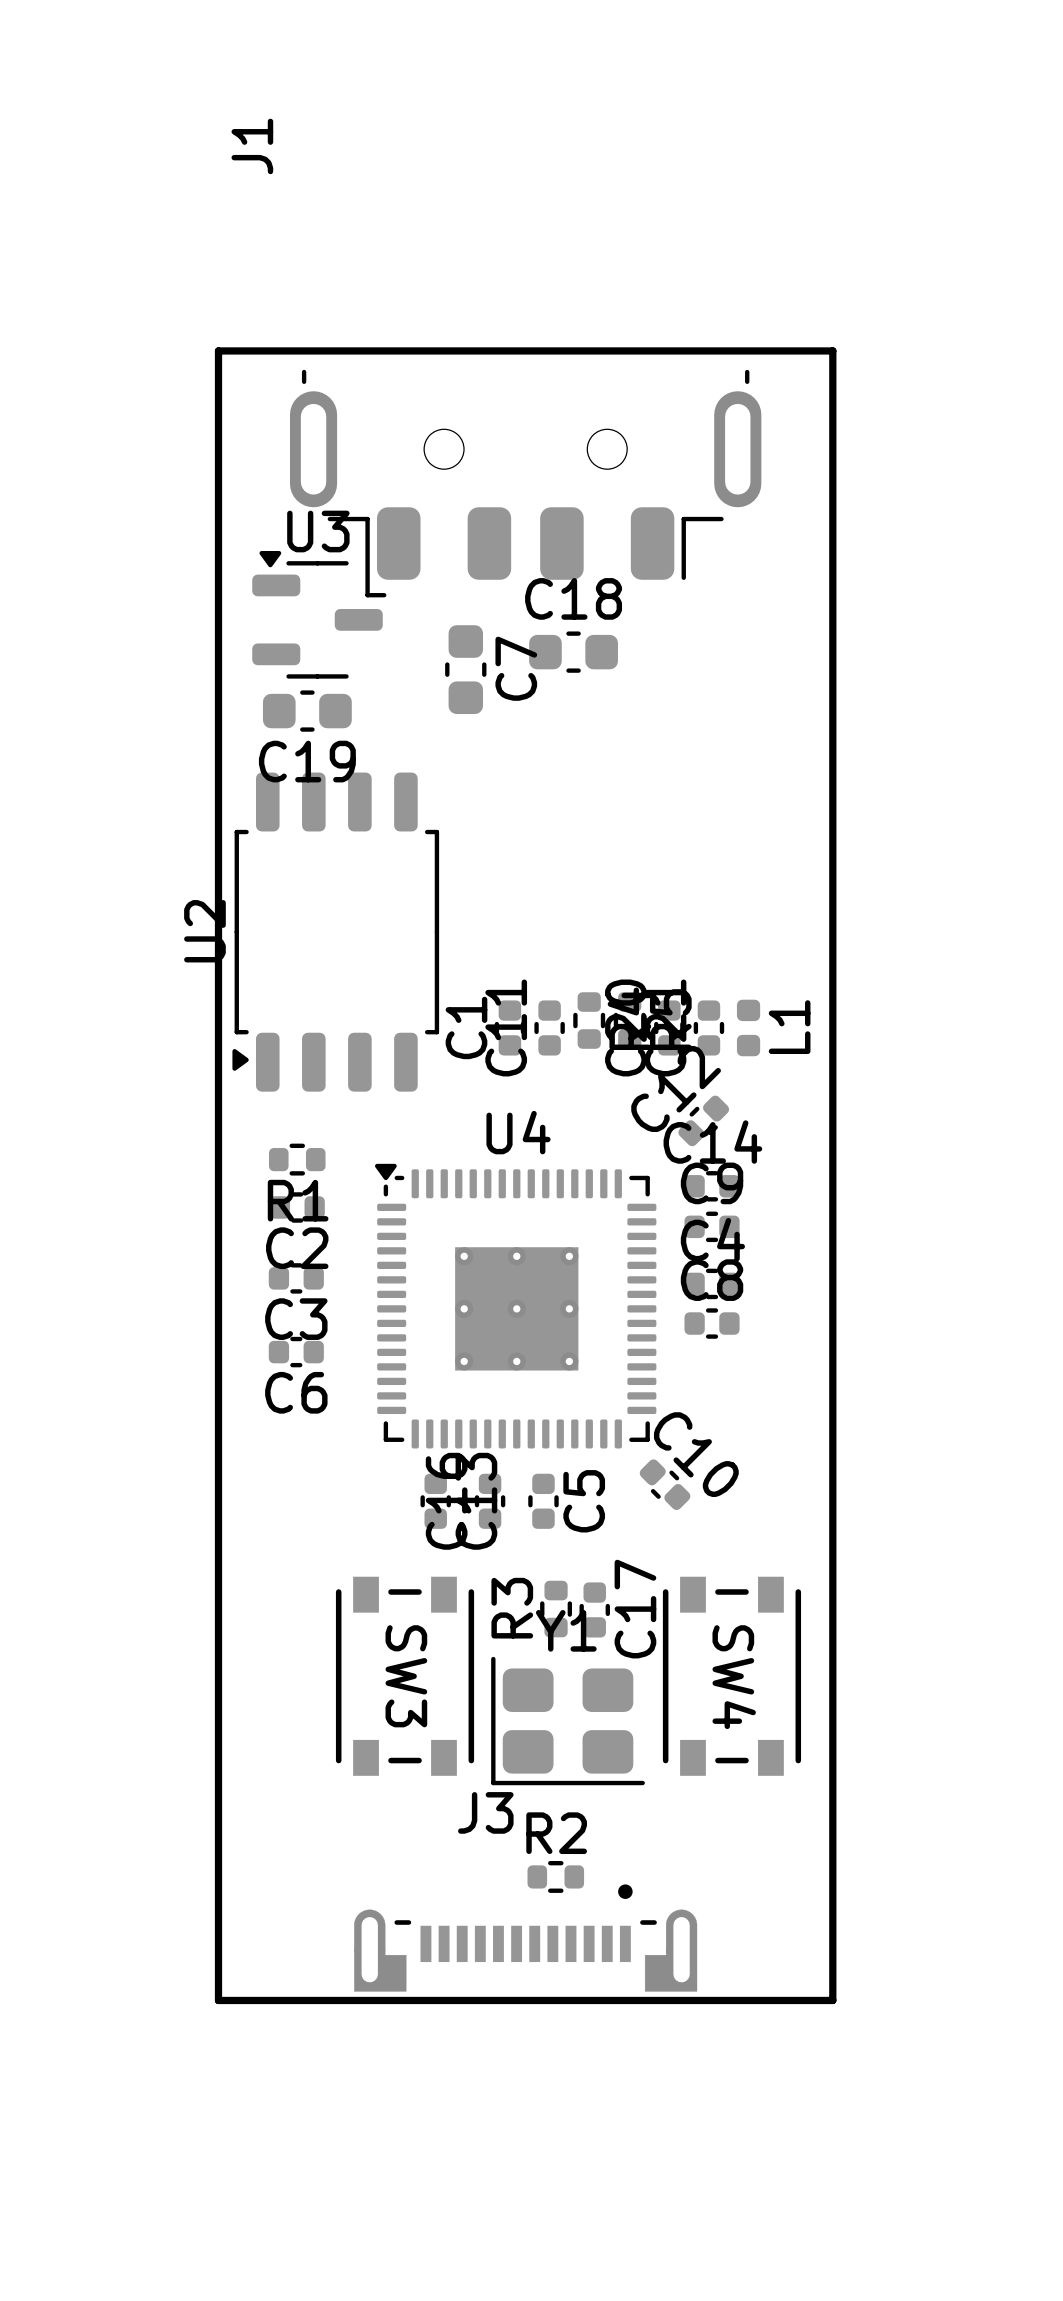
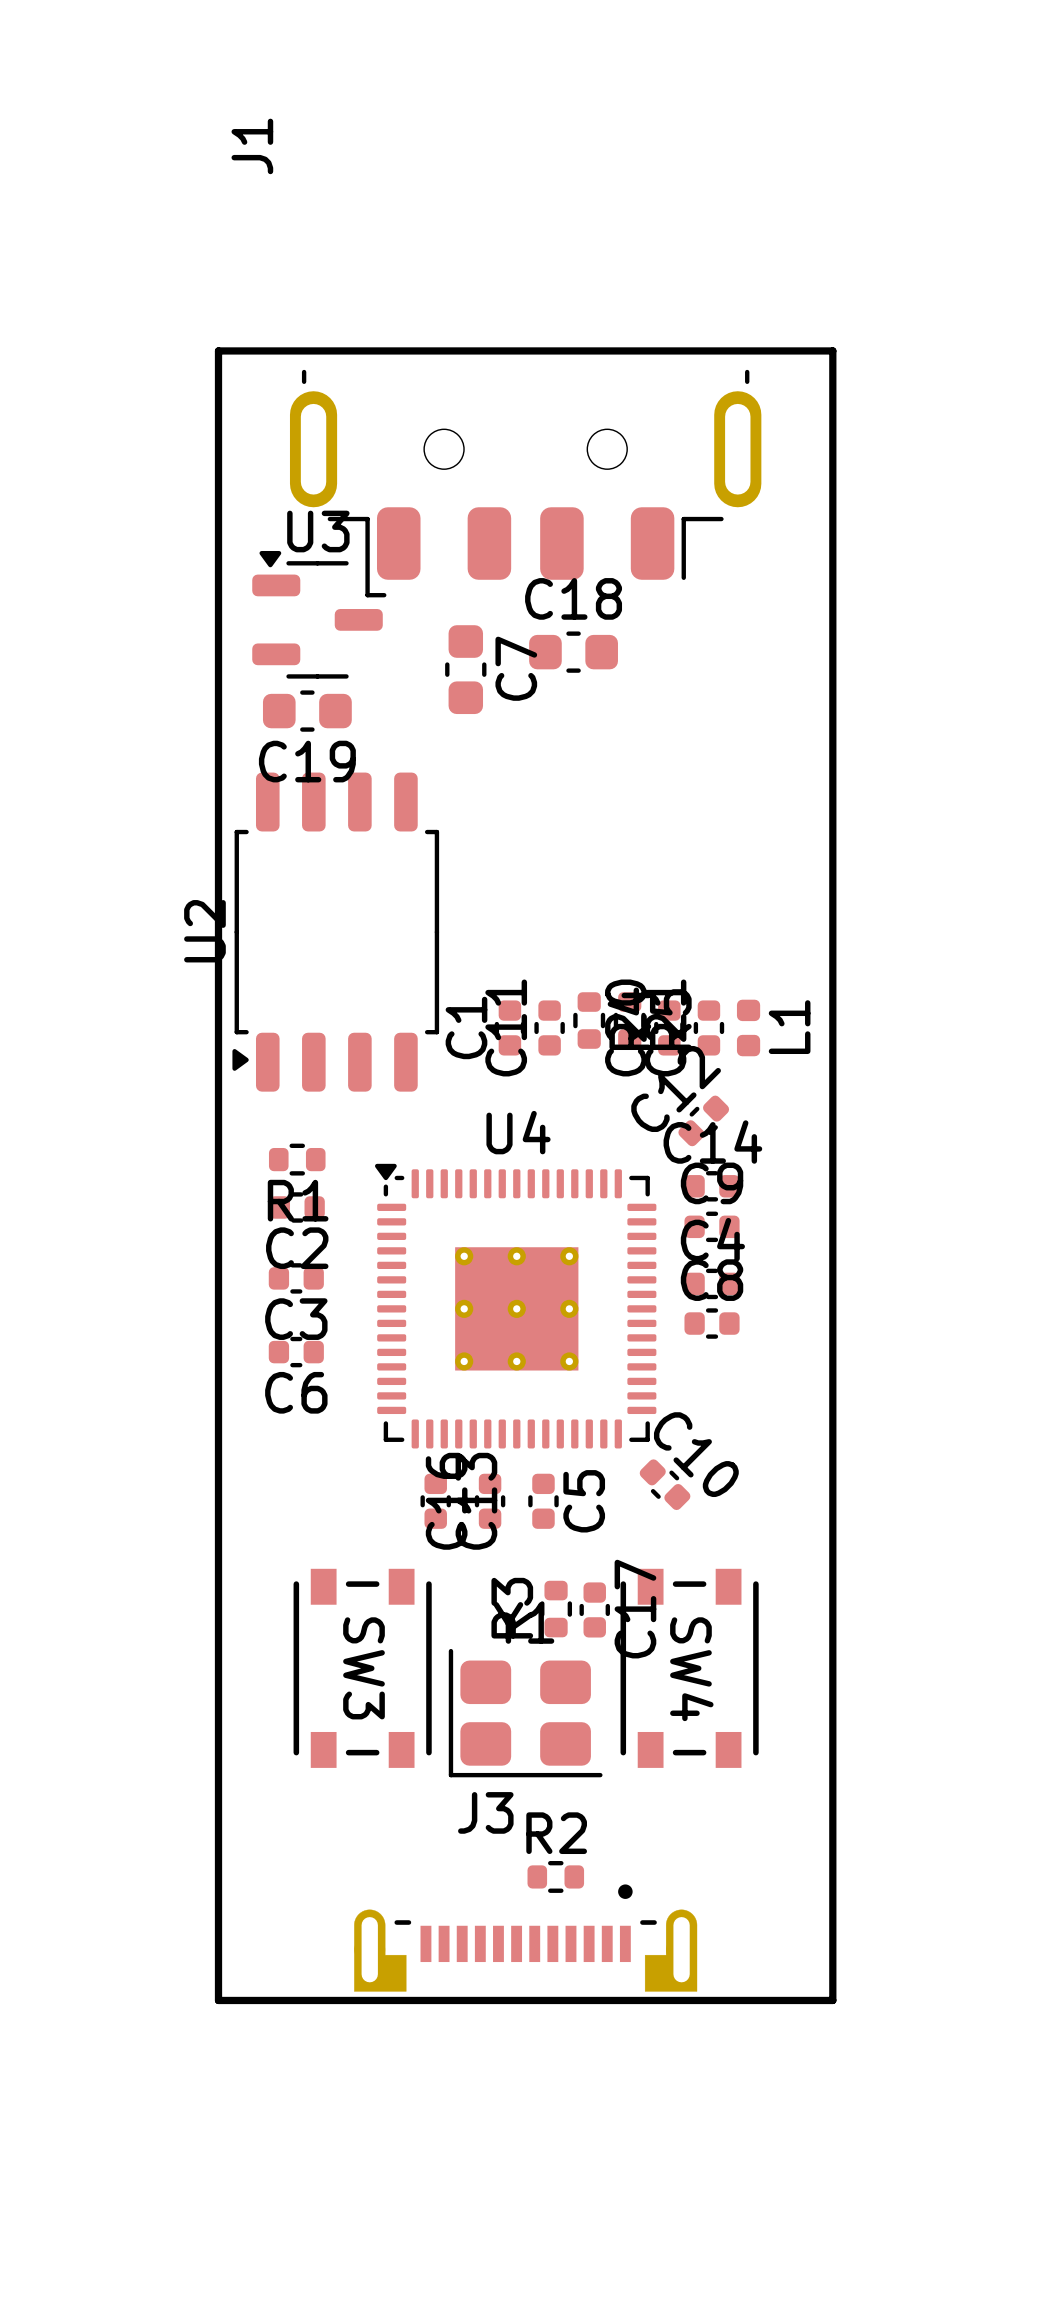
SW3 position: (405, 1676) -> (362, 1668)
SW4 position: (731, 1676) -> (689, 1668)
Y1 position: (568, 1721) -> (525, 1713)

